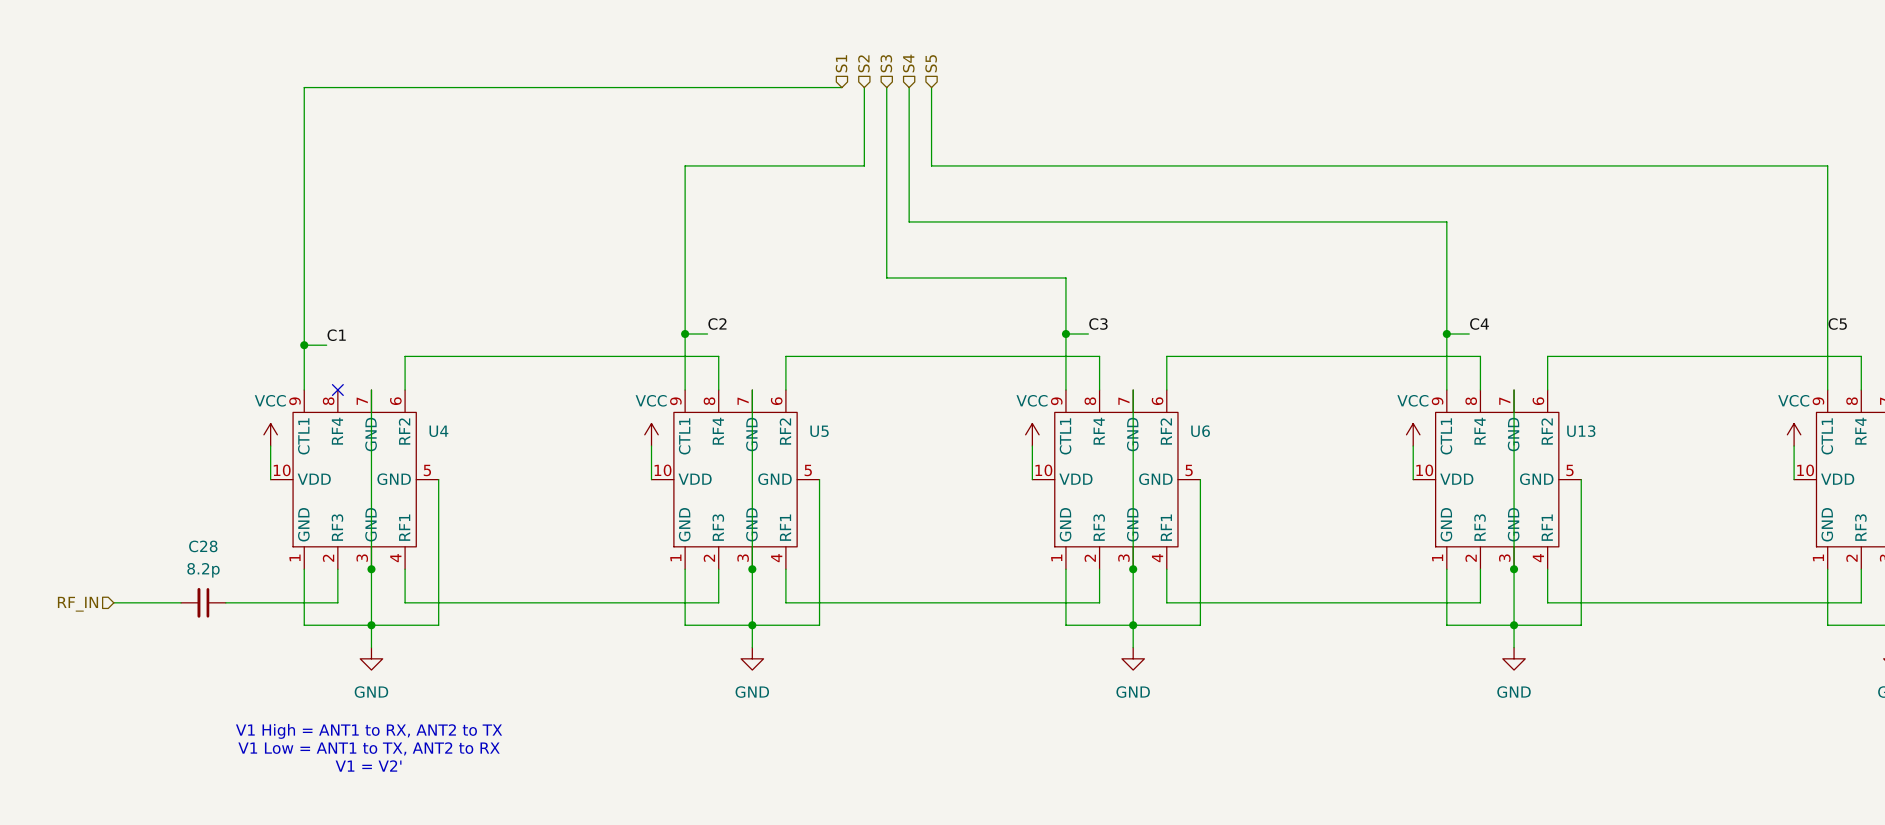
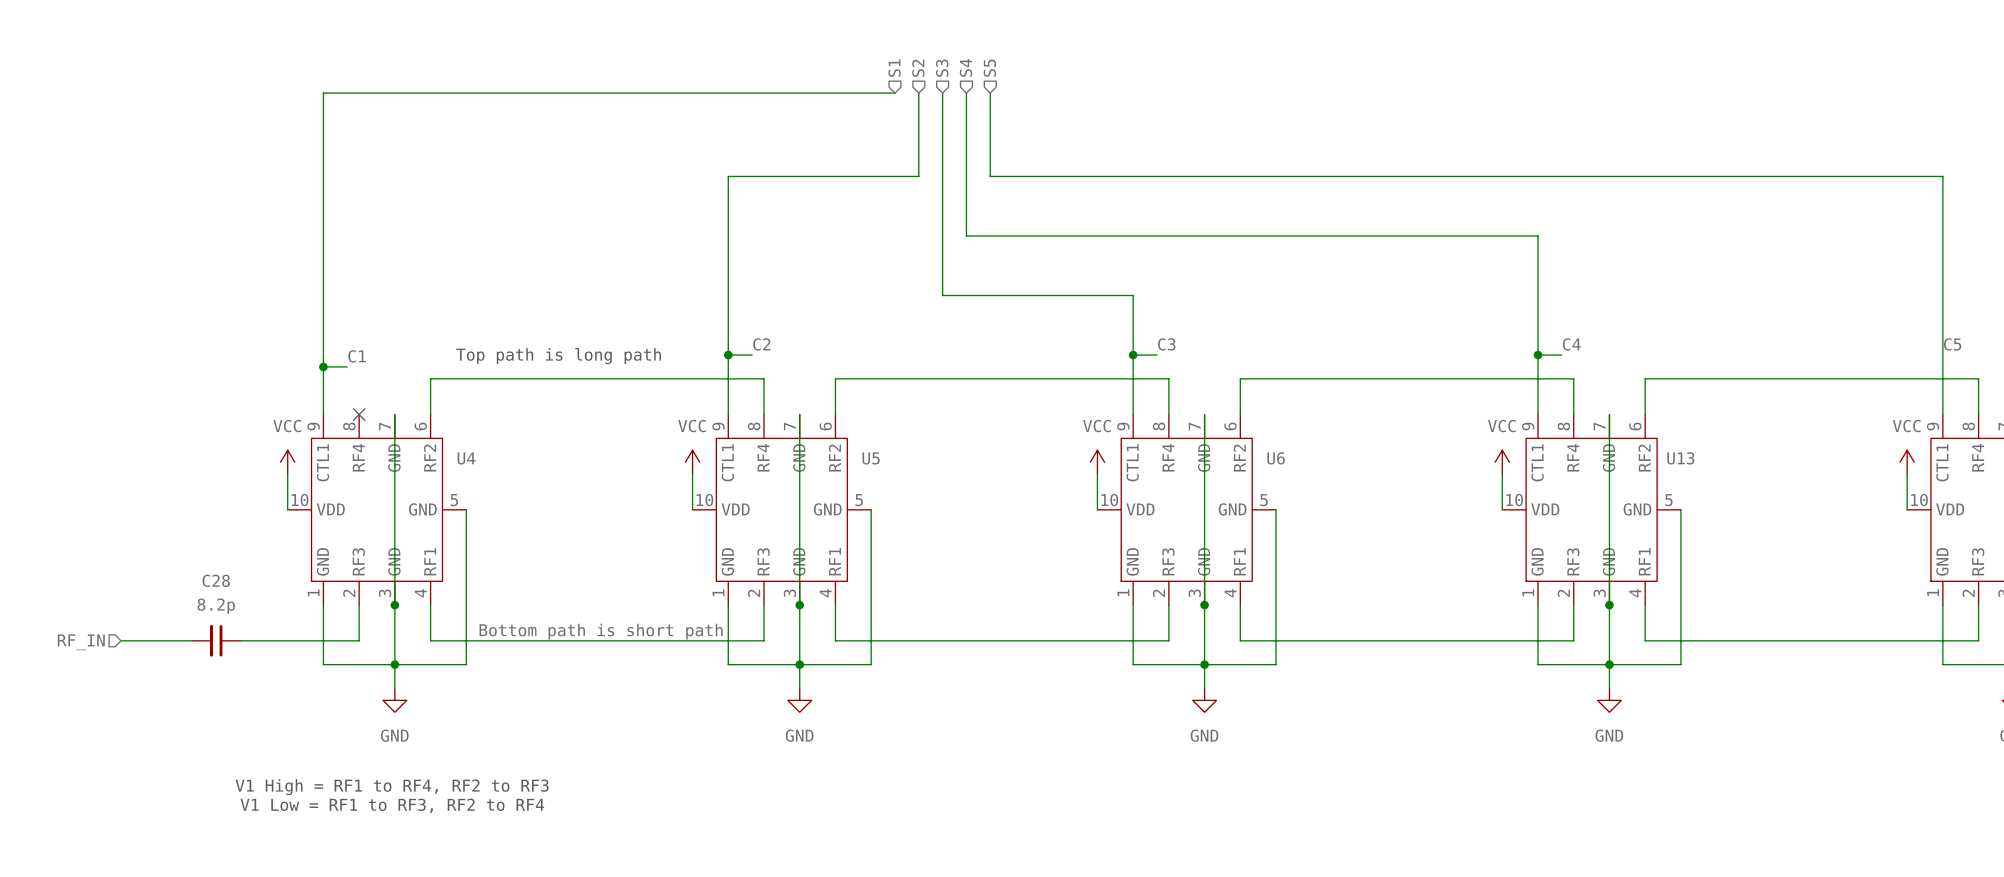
text: none -> Top path is long path (558, 356)
label: none -> Bottom path is short path (601, 631)
text: V1 High = ANT1 to RX, ANT2 to TX (369, 731) -> none
text: none -> V1 High = RF1 to RF4, RF2 to RF3 (392, 787)
text: V1 Low = ANT1 to TX, ANT2 to RX (369, 748) -> none
text: none -> V1 Low = RF1 to RF3, RF2 to RF4 (392, 805)
text: V1 = V2' (368, 766) -> none

